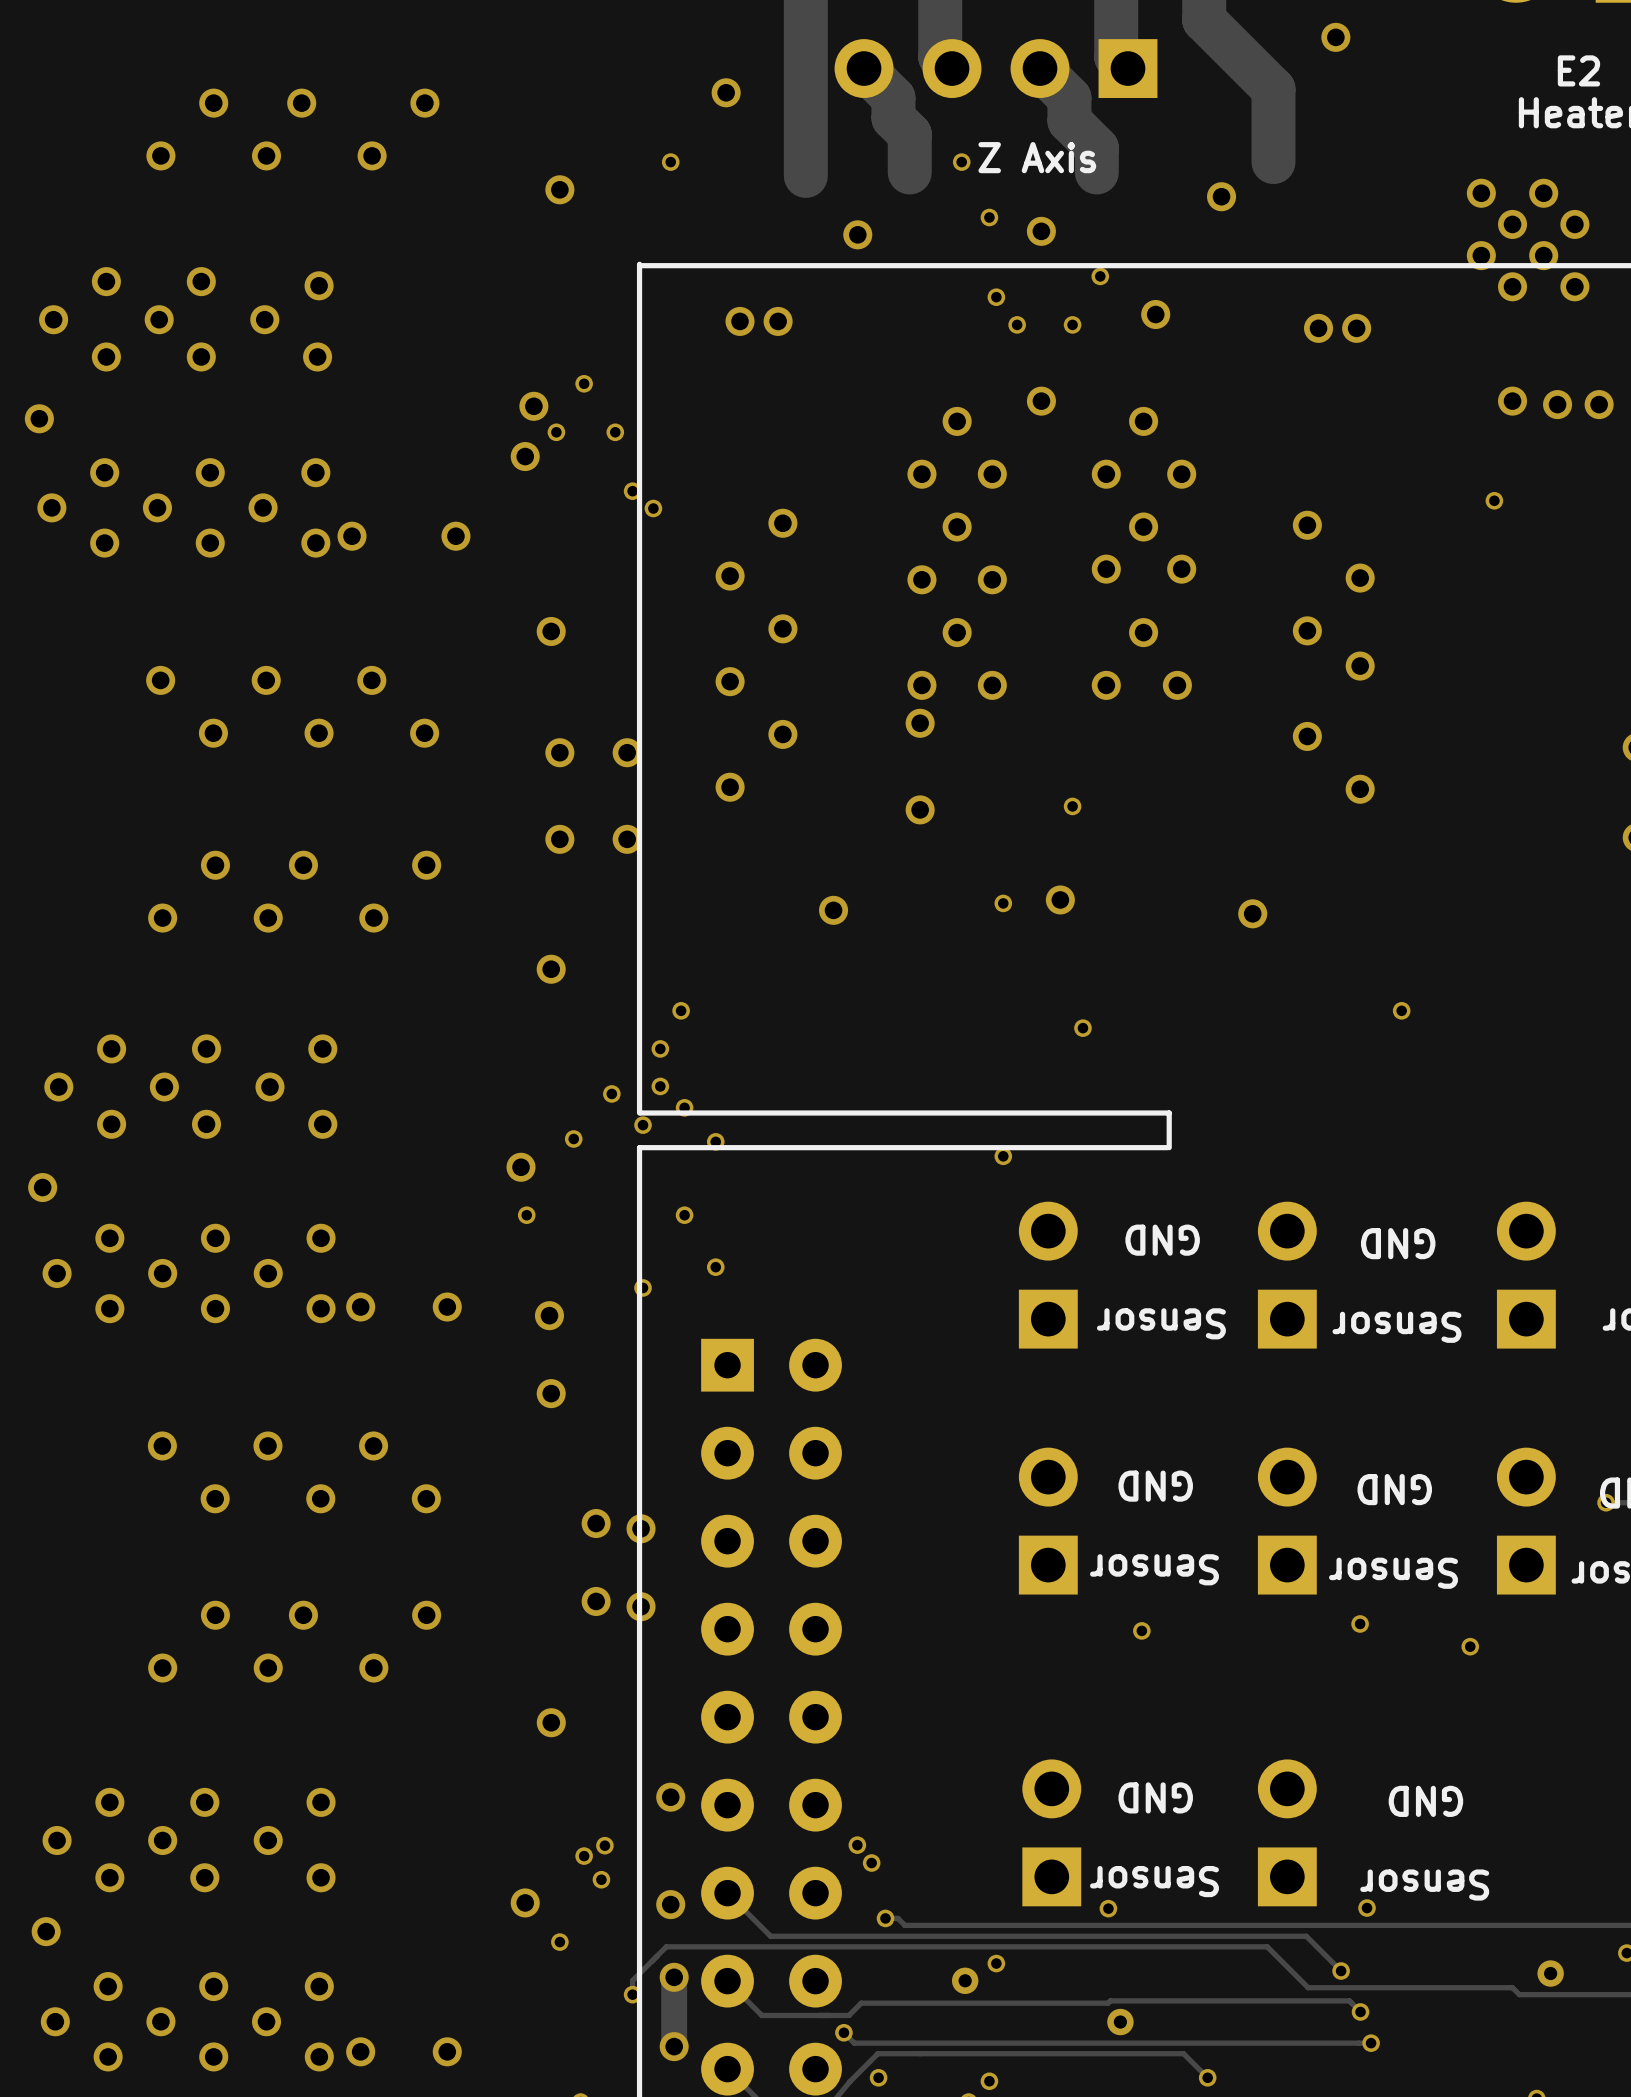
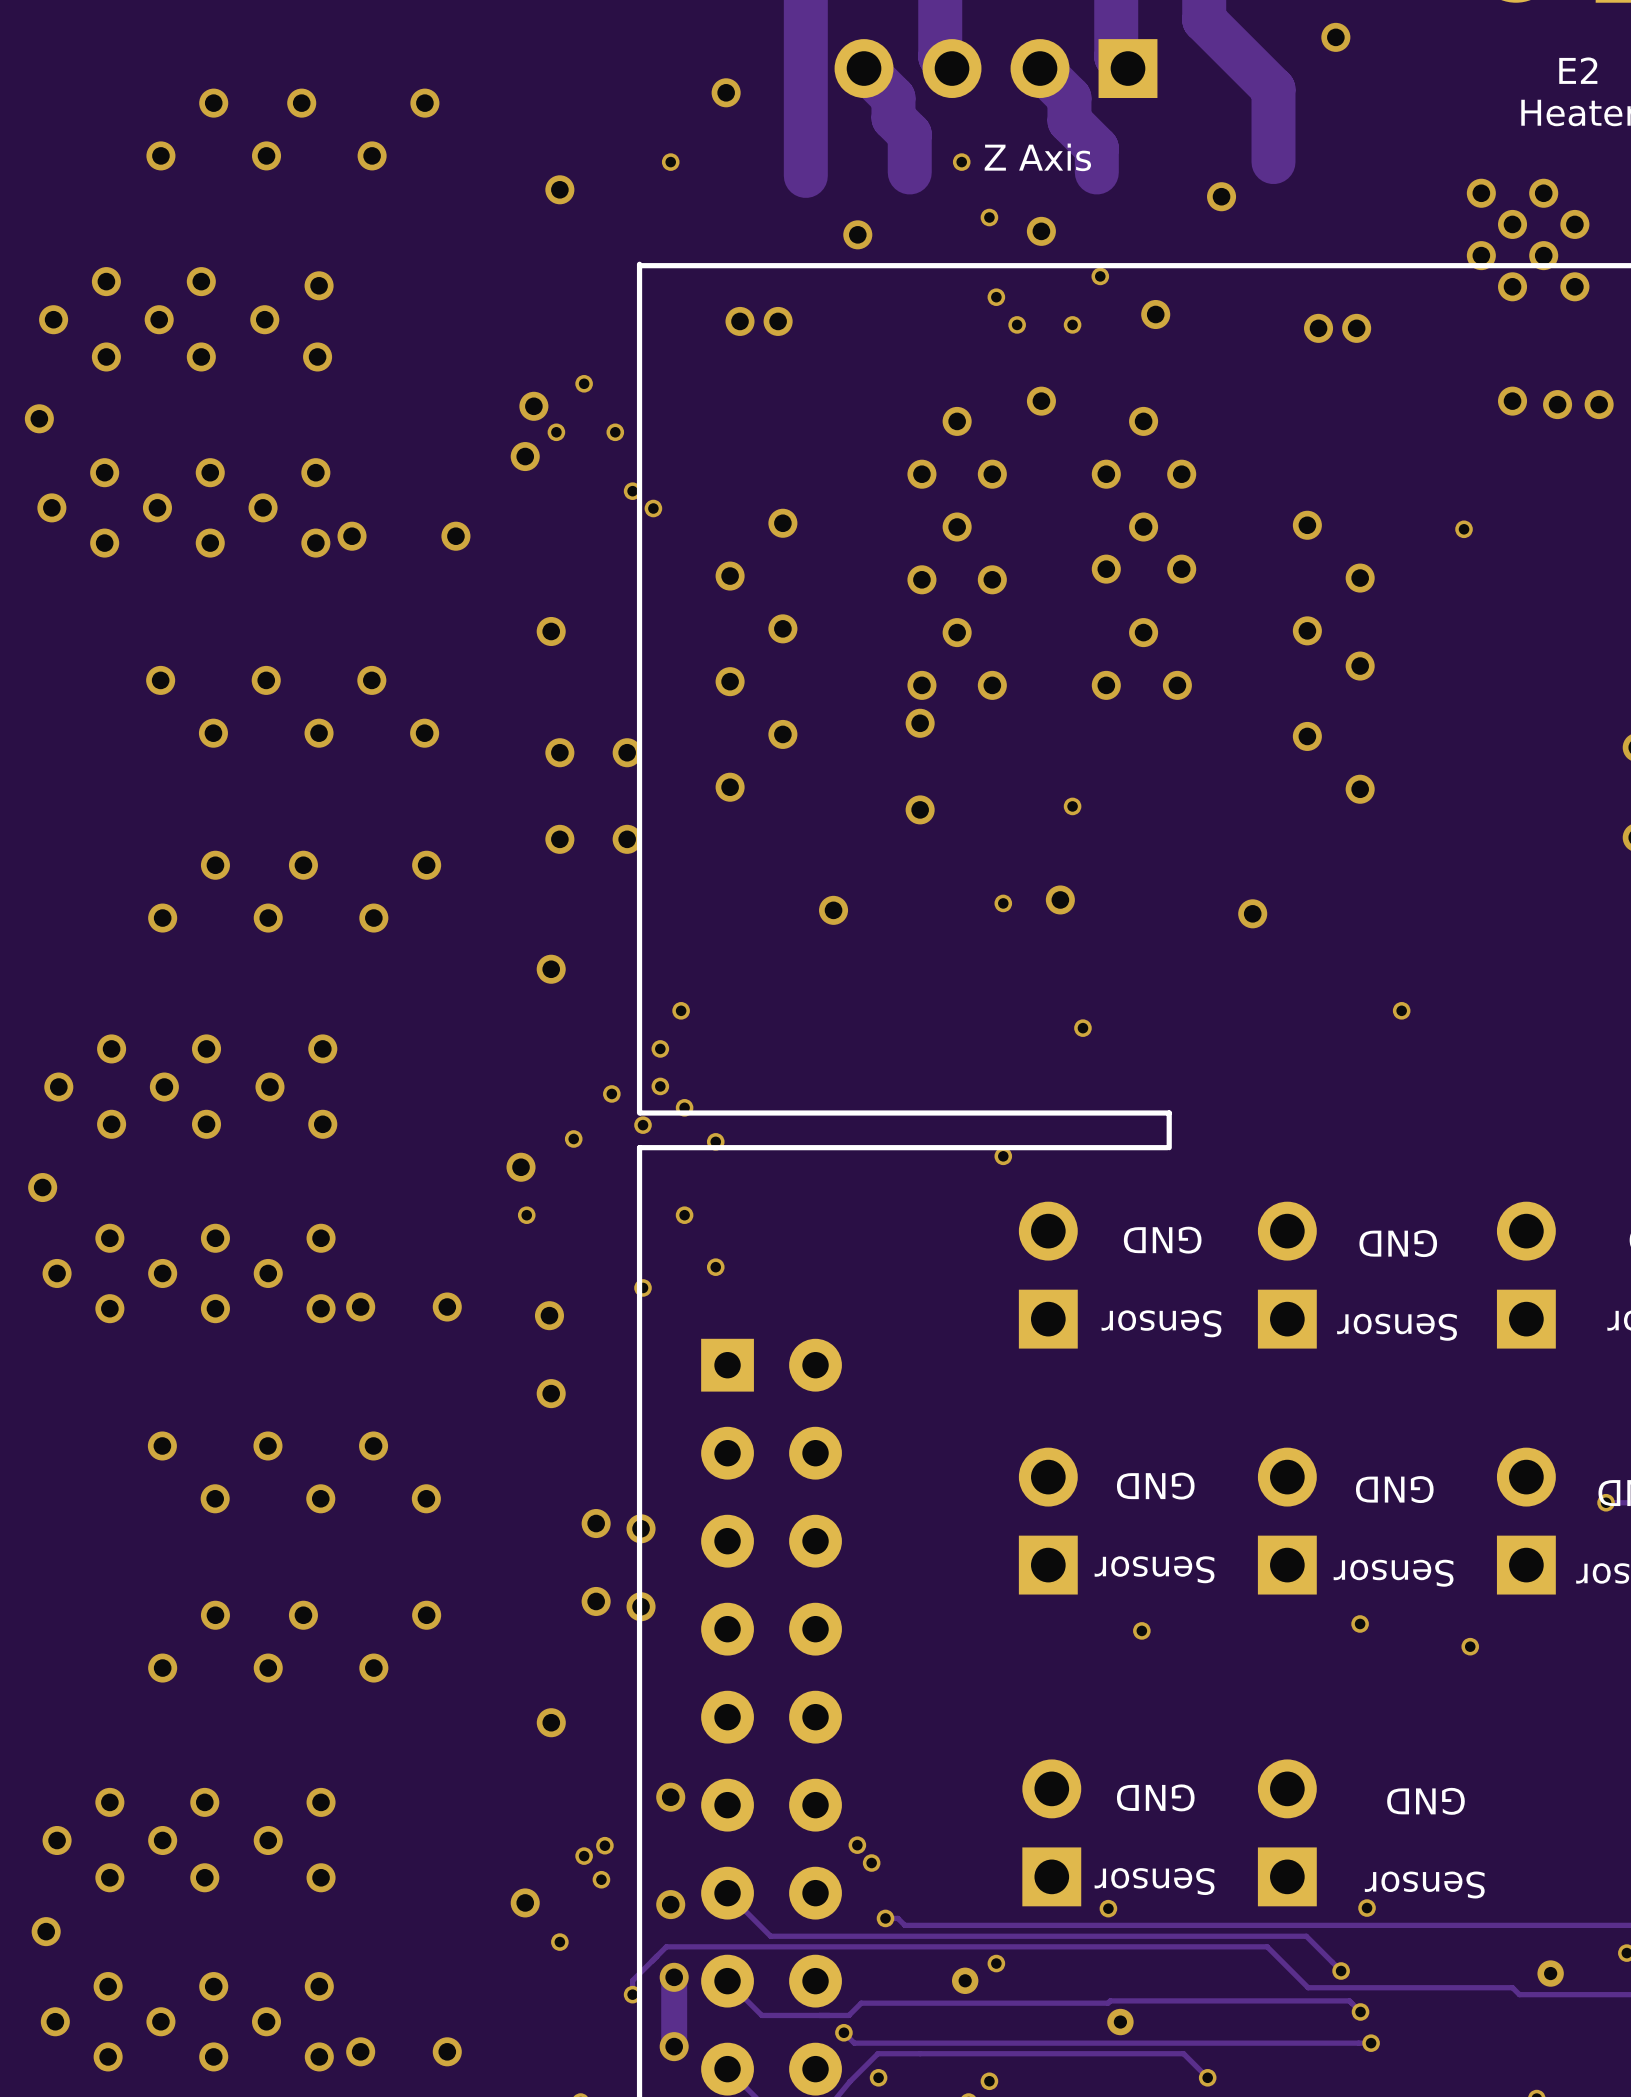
via position: (1494, 500) -> (1464, 529)

